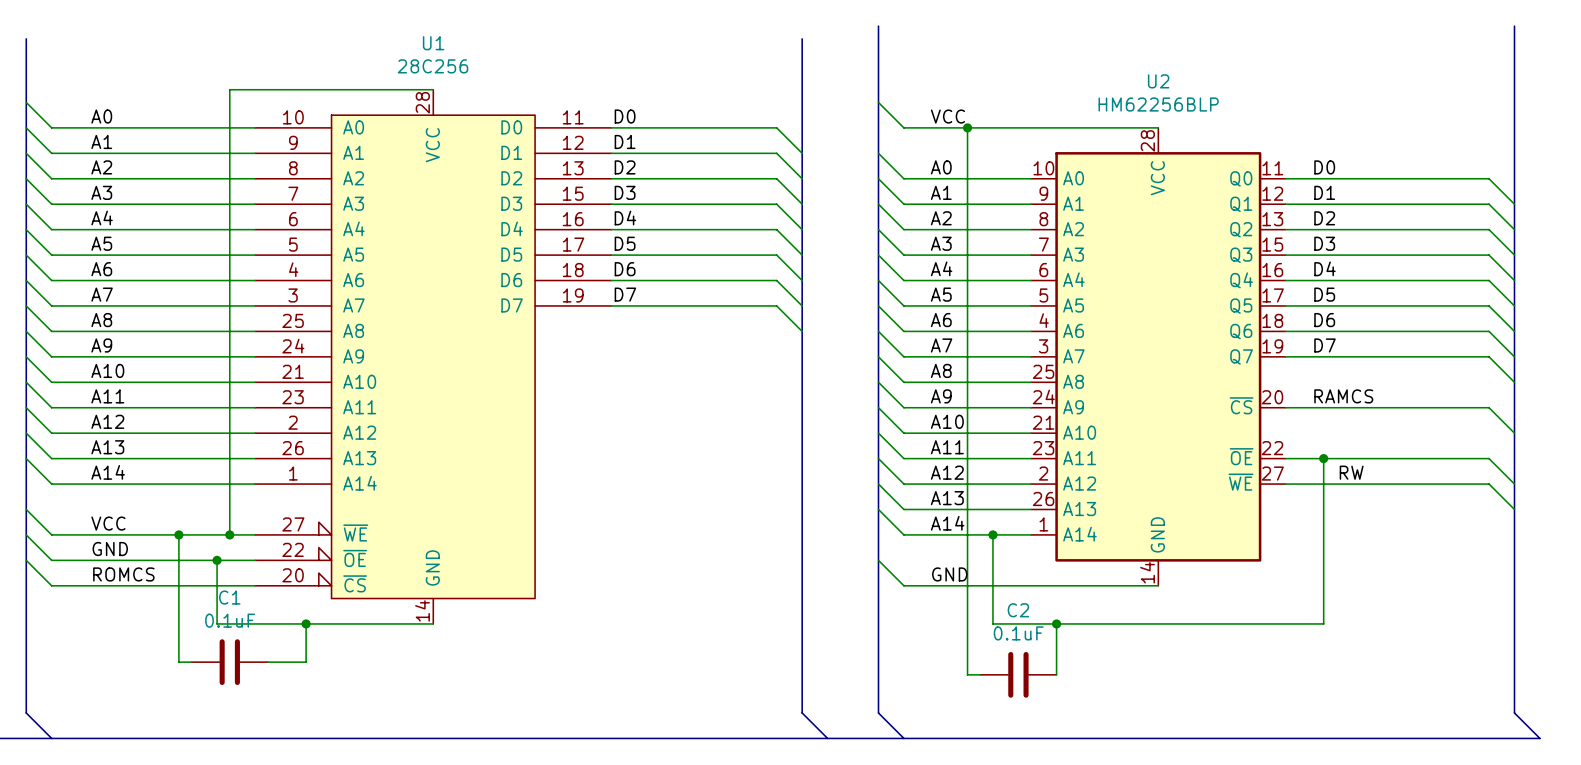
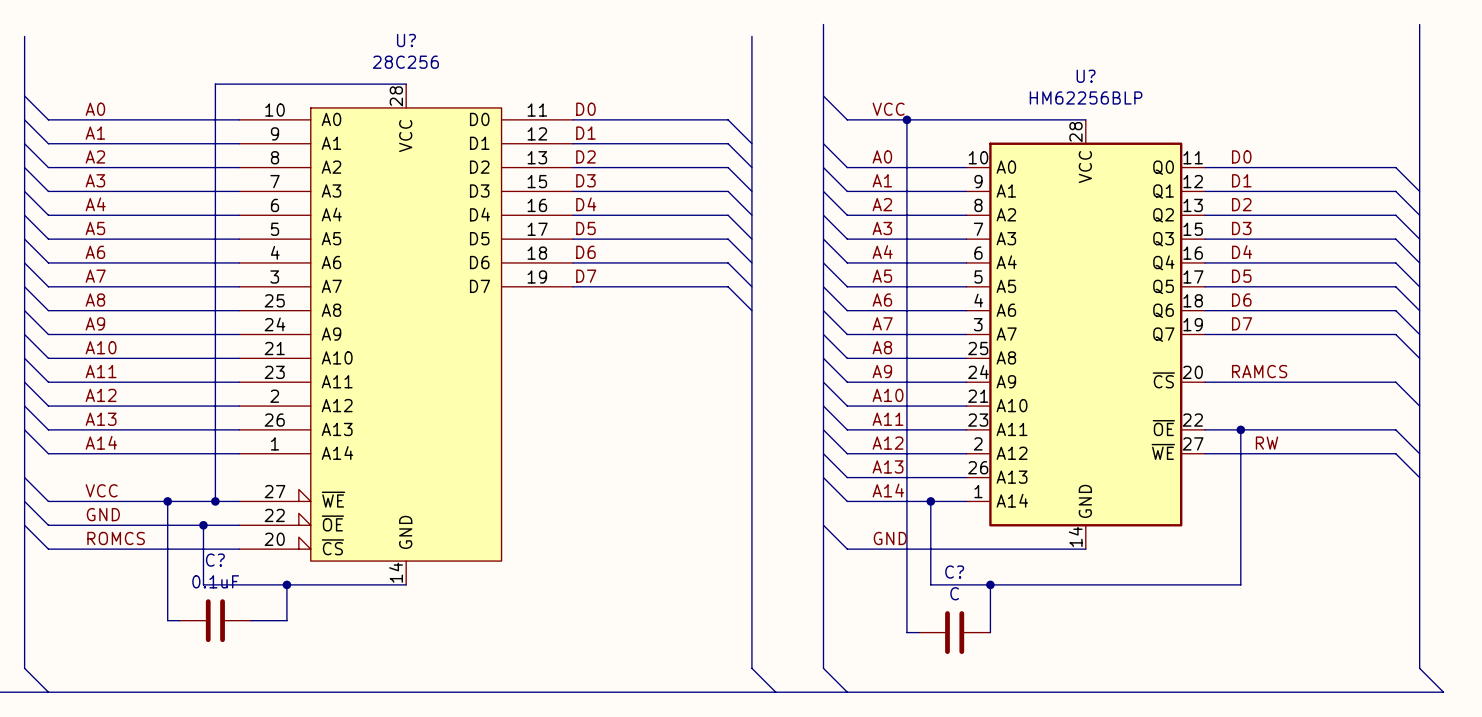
U1 name: U1 (433, 43) -> U? (406, 40)
U2 name: U2 (1158, 81) -> U? (1086, 76)
C1 name: C1 (229, 597) -> C? (215, 560)
C2 name: C2 (1018, 610) -> C? (954, 572)
C2 value: 0.1uF (1018, 633) -> C (954, 593)

